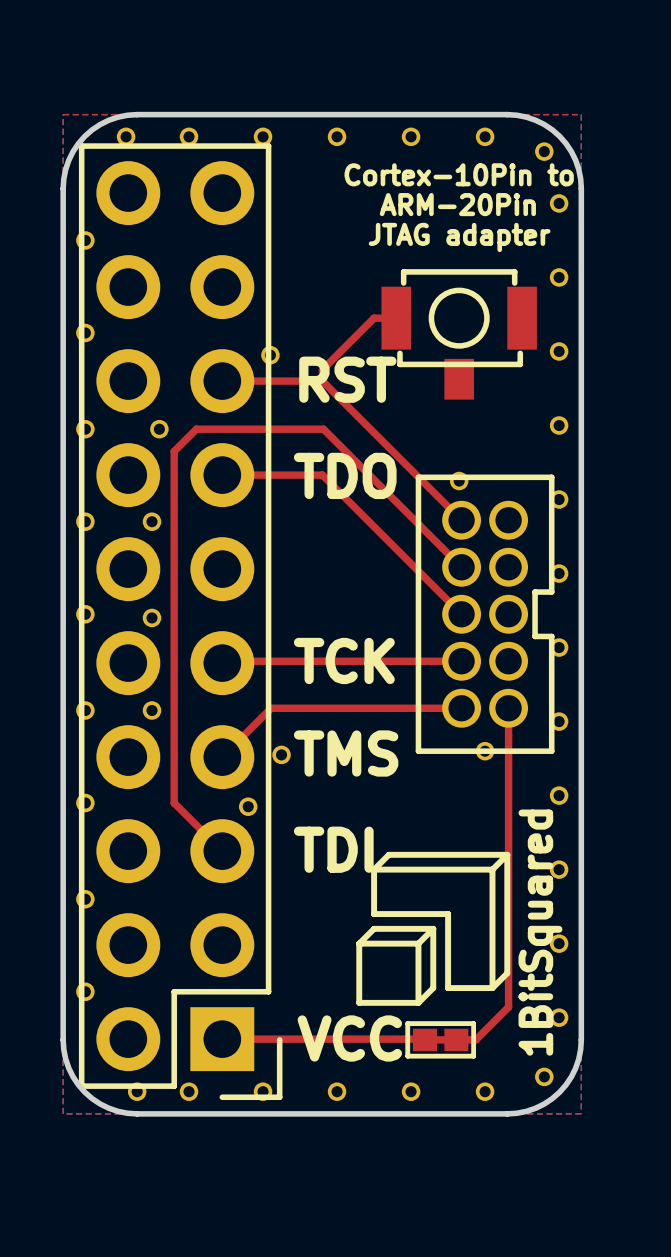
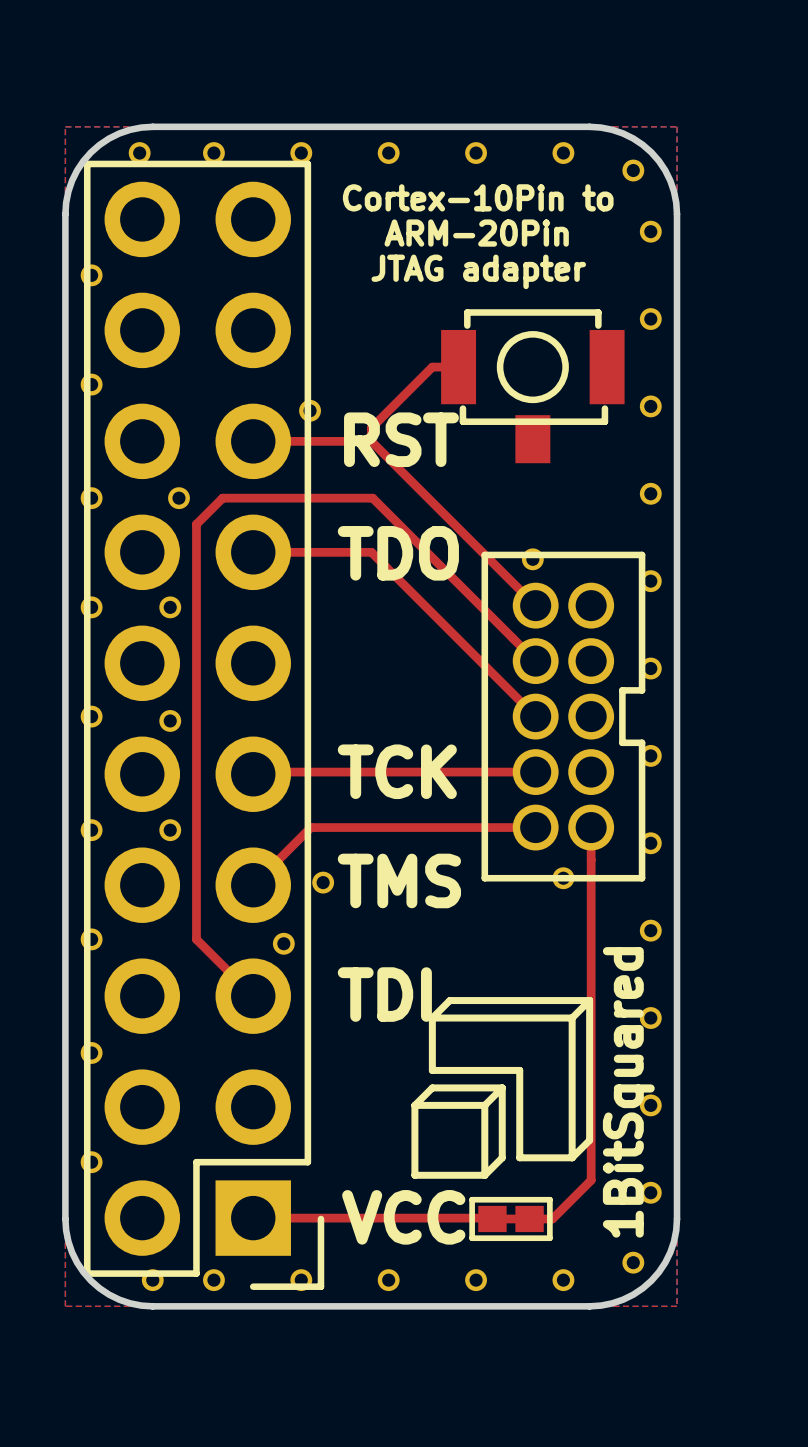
text position: Cortex-10Pin to (459, 174) -> Cortex-10Pin to (478, 197)
text position: ARM-20Pin (457, 204) -> ARM-20Pin (476, 233)
text position: JTAG adapter (459, 237) -> JTAG adapter (478, 271)

